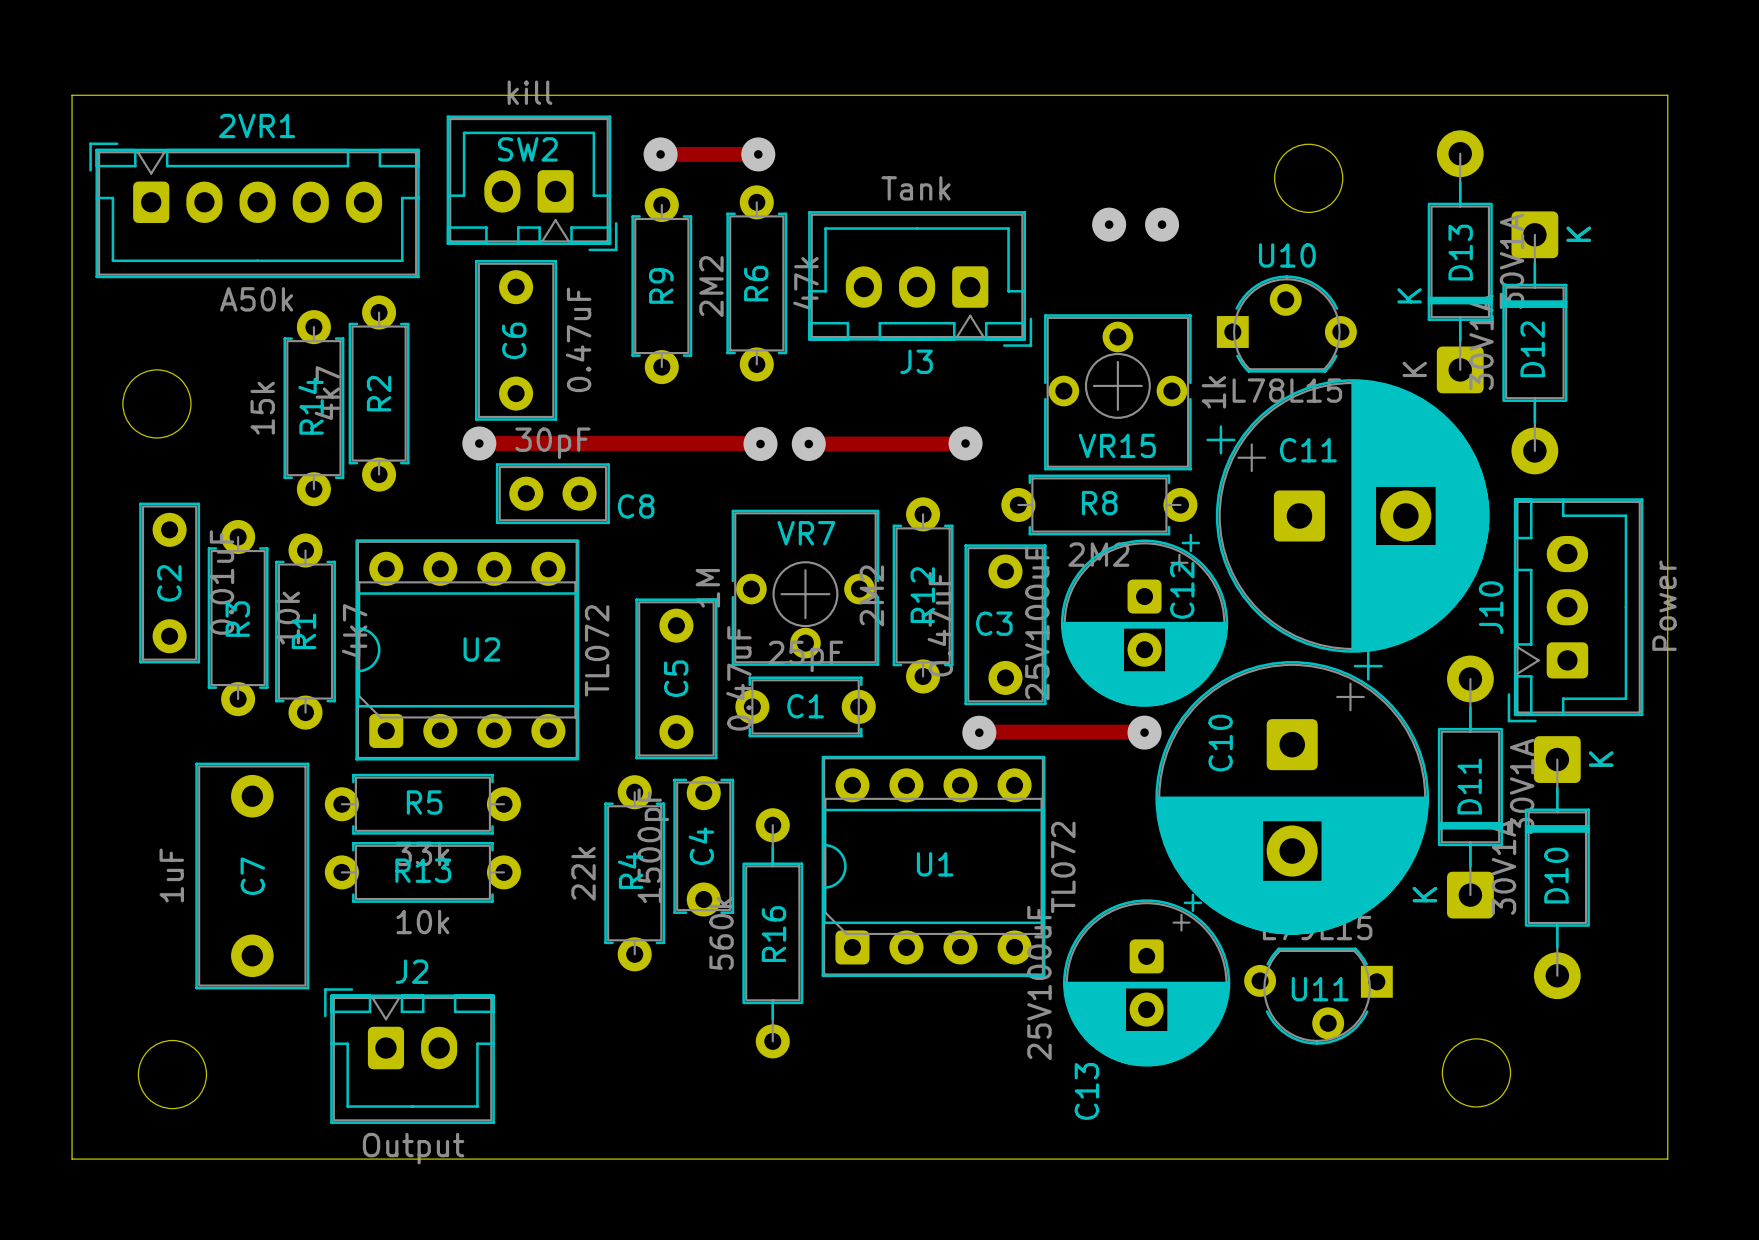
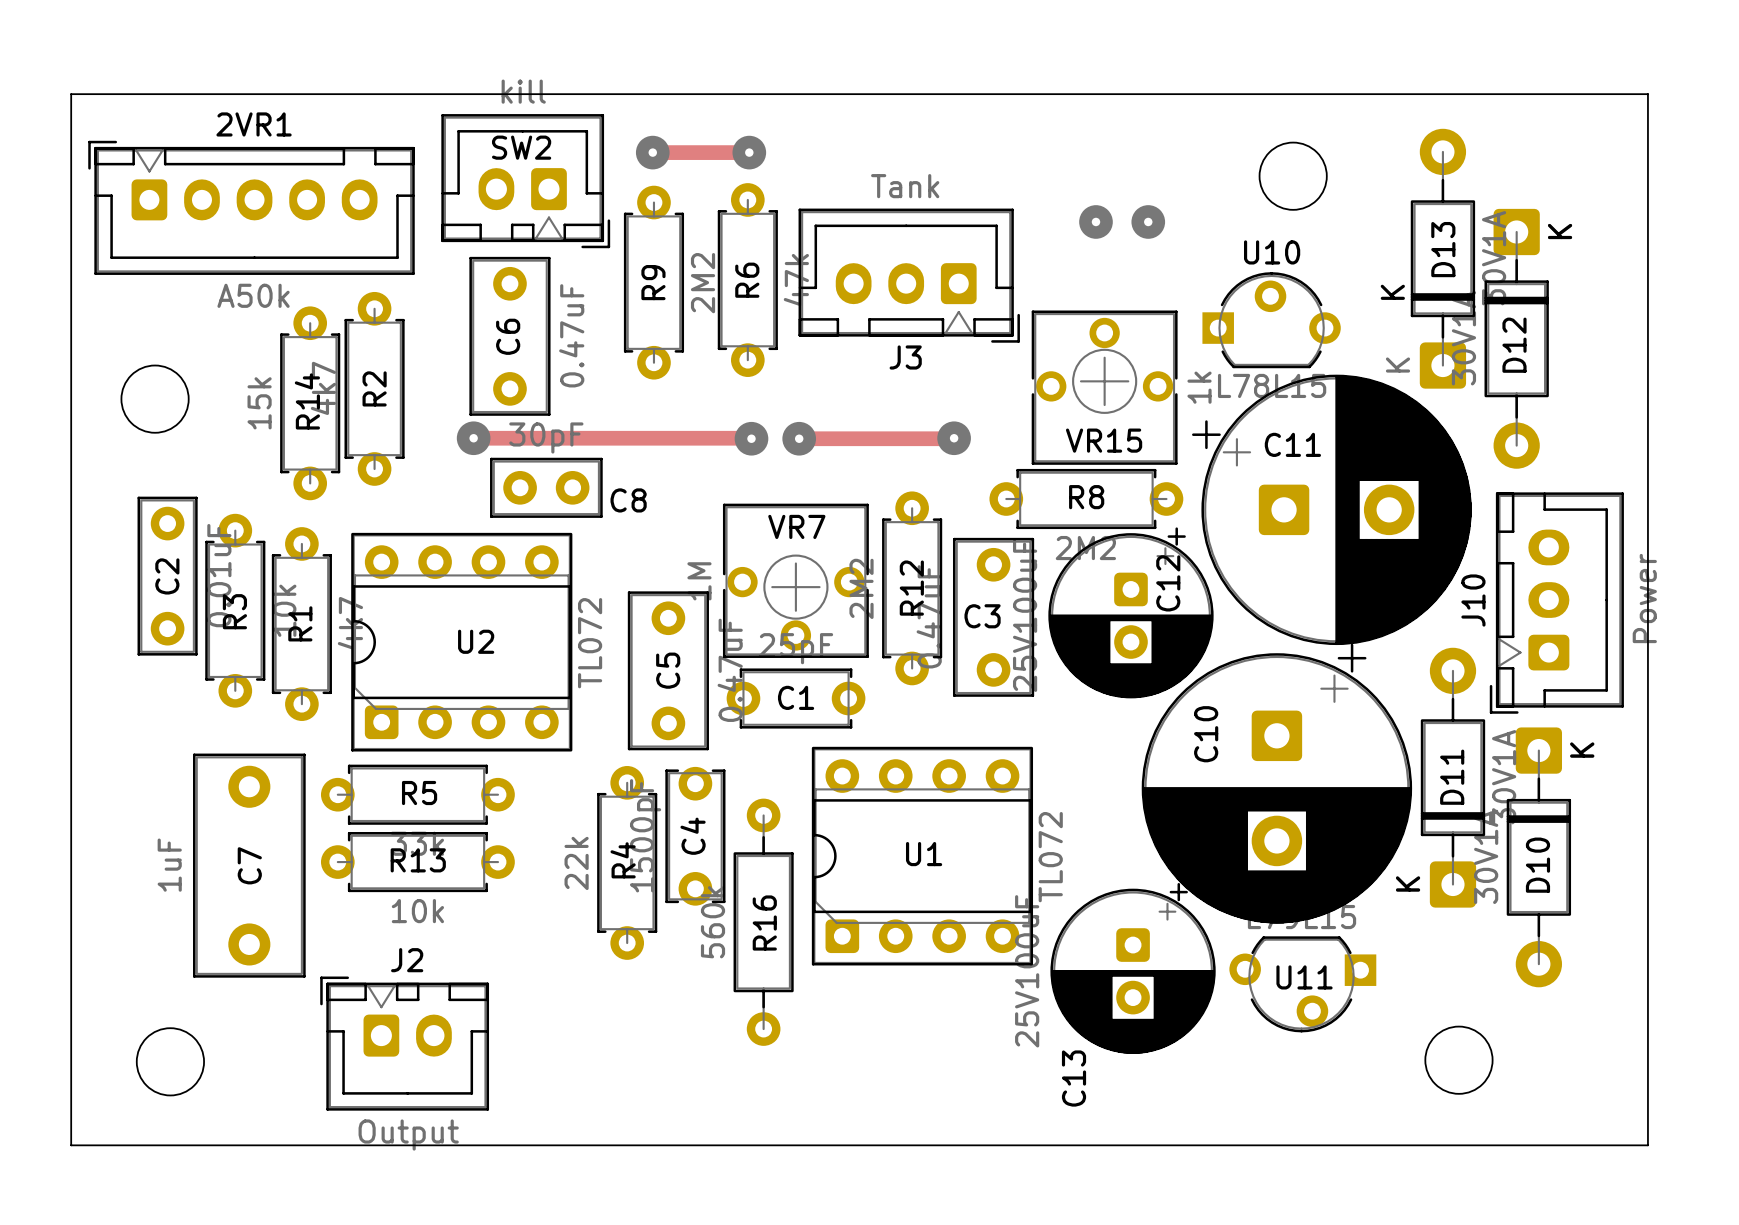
track: (975, 728) (978, 732) (1144, 732) -> none
via: (979, 732) -> none
via: (1144, 732) -> none

